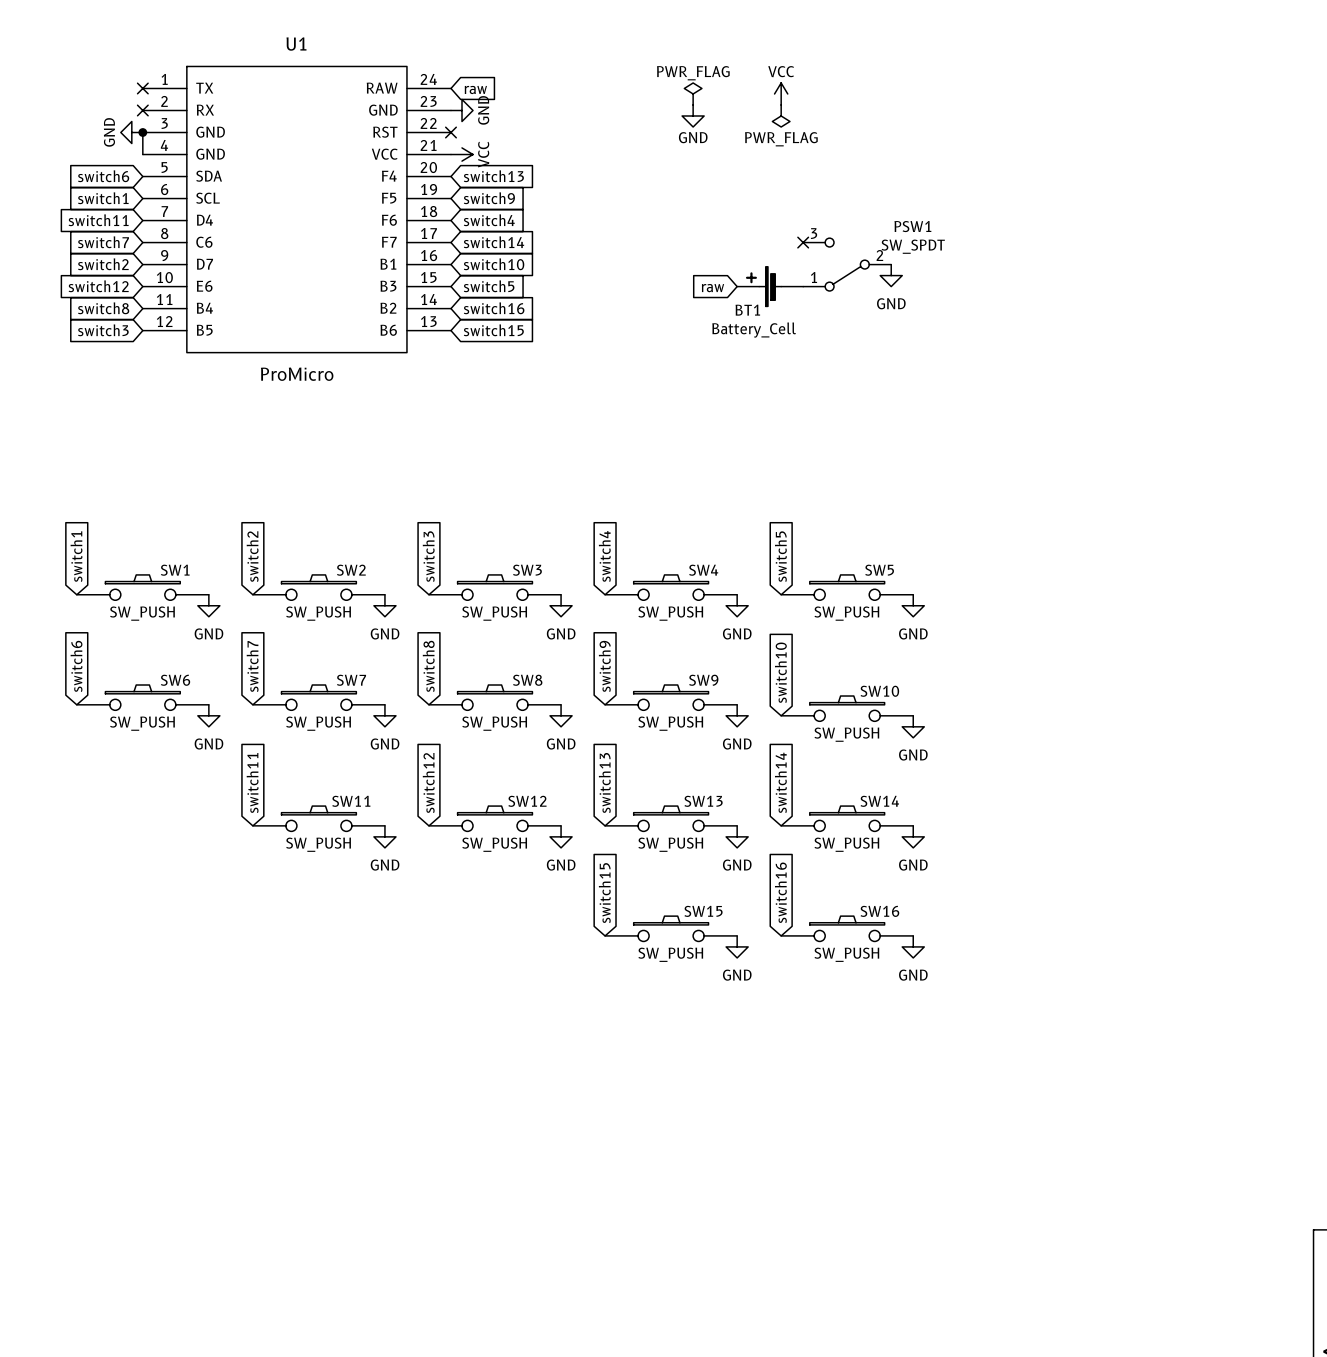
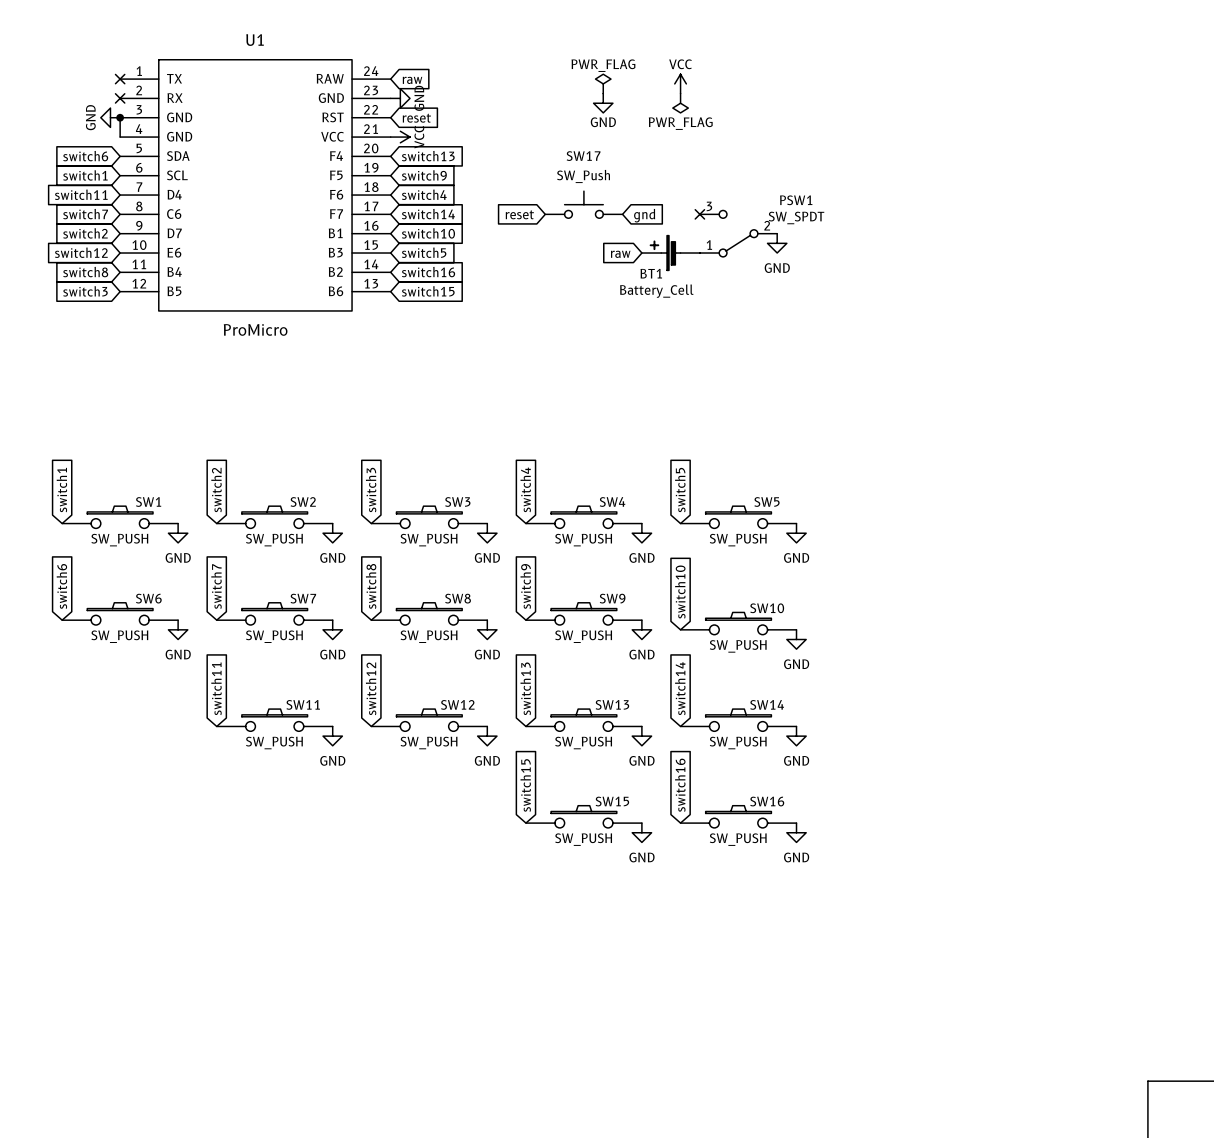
no-connect mark: (450, 132) -> none
global label: none -> reset (416, 118)
SW17: none -> SW_Push (583, 204)
global label: none -> reset (519, 214)
global label: none -> gnd (644, 215)

